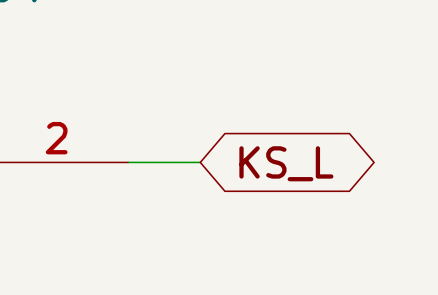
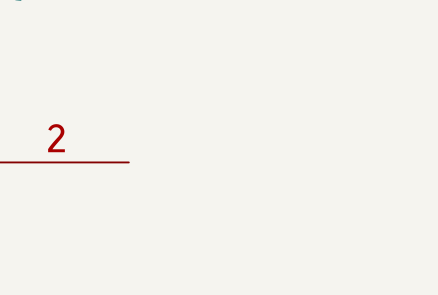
wire: (128, 162) (200, 162) -> none
global label: KS_L (286, 163) -> none

